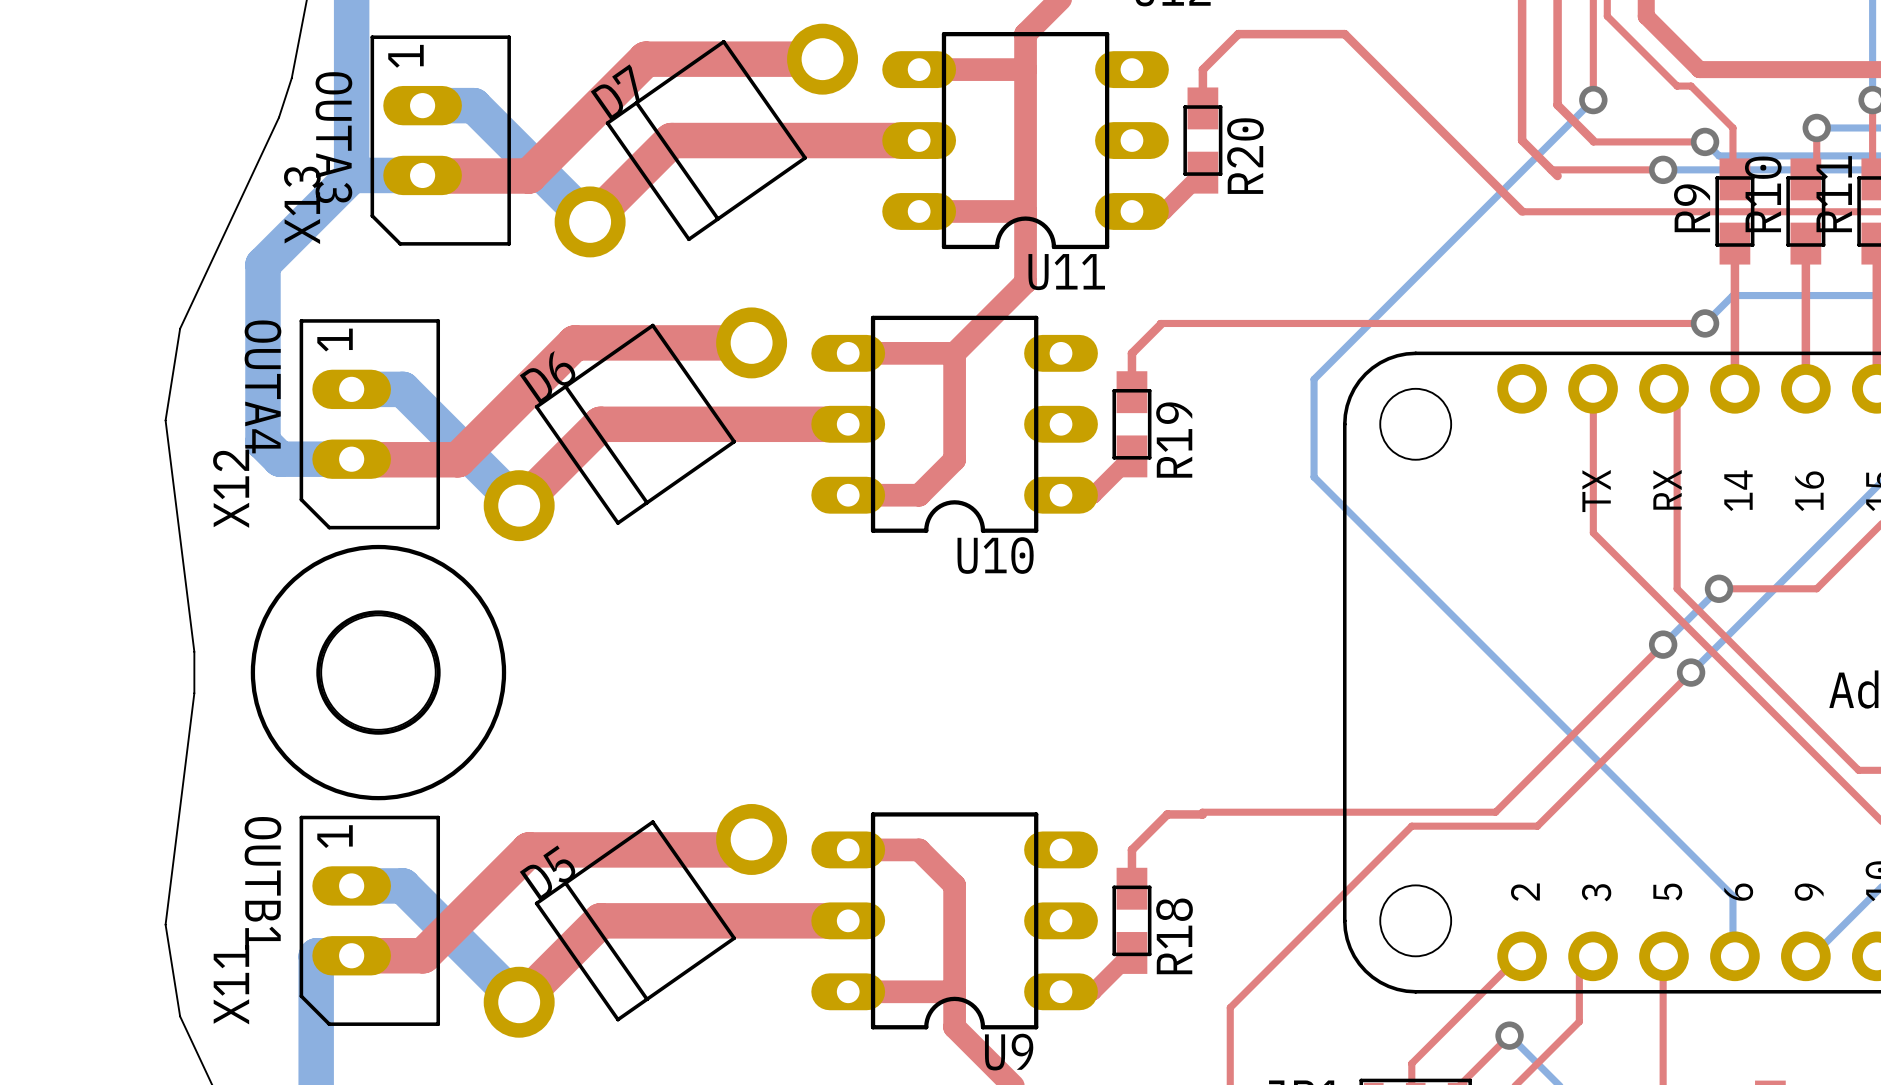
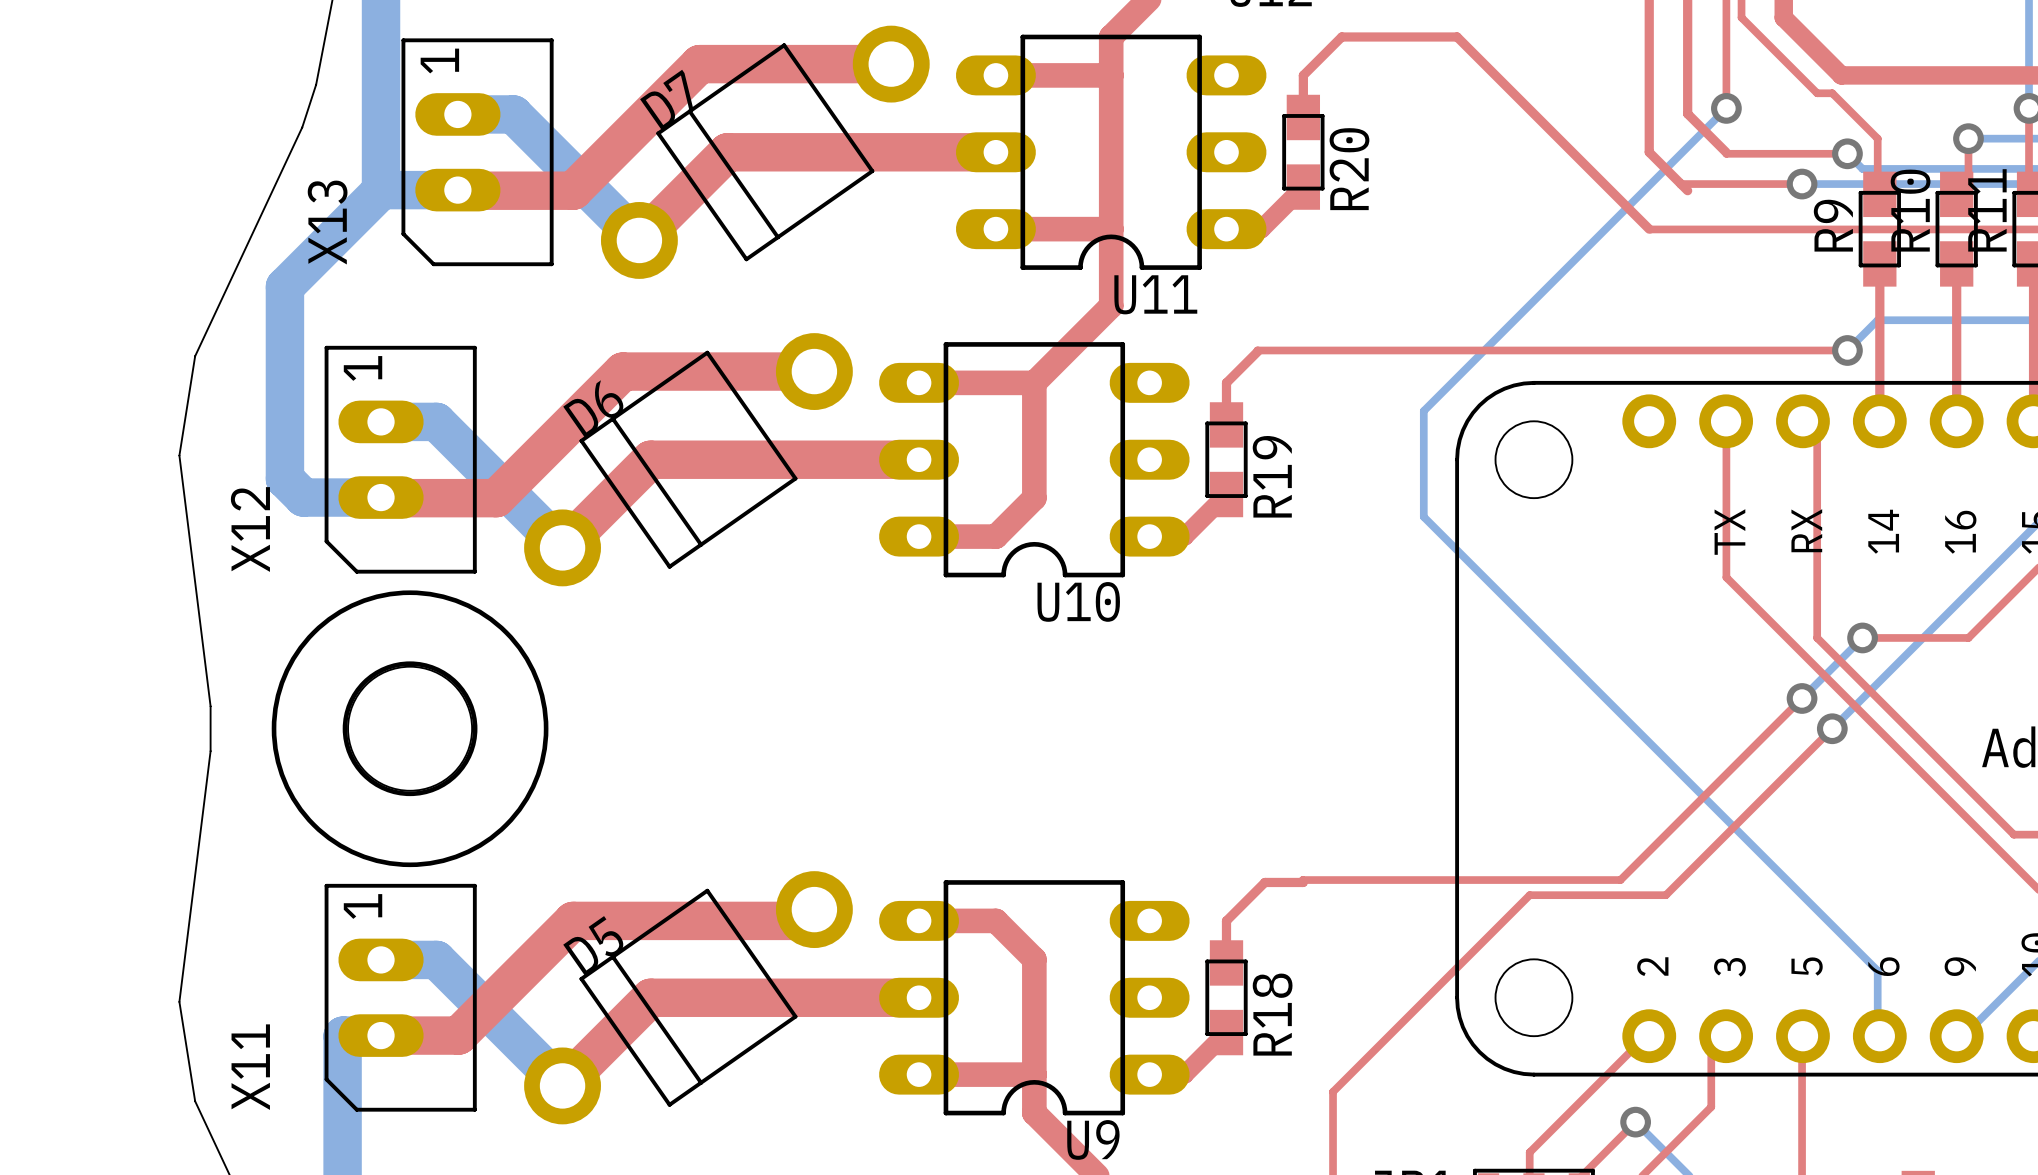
text: OUTA3 (333, 137) -> none
text: OUTA4 (262, 386) -> none
text: OUTB1 (262, 883) -> none

